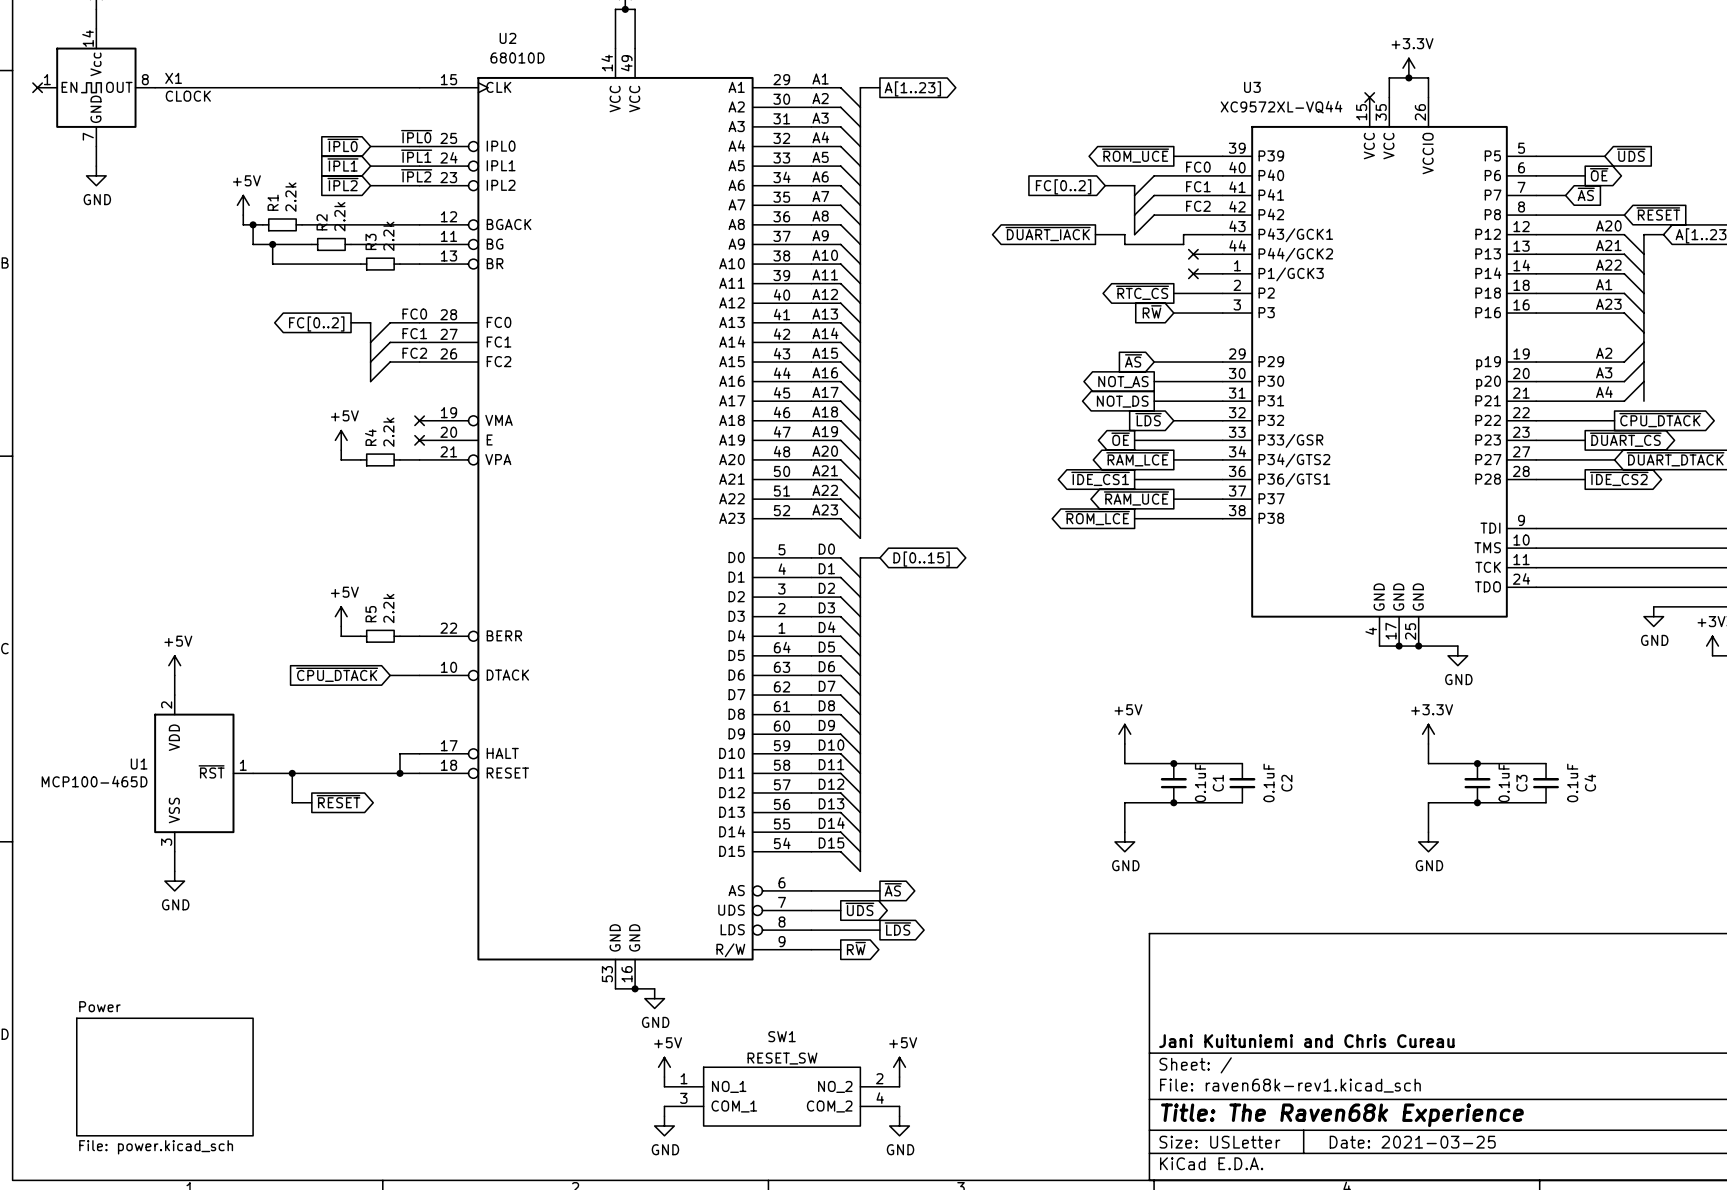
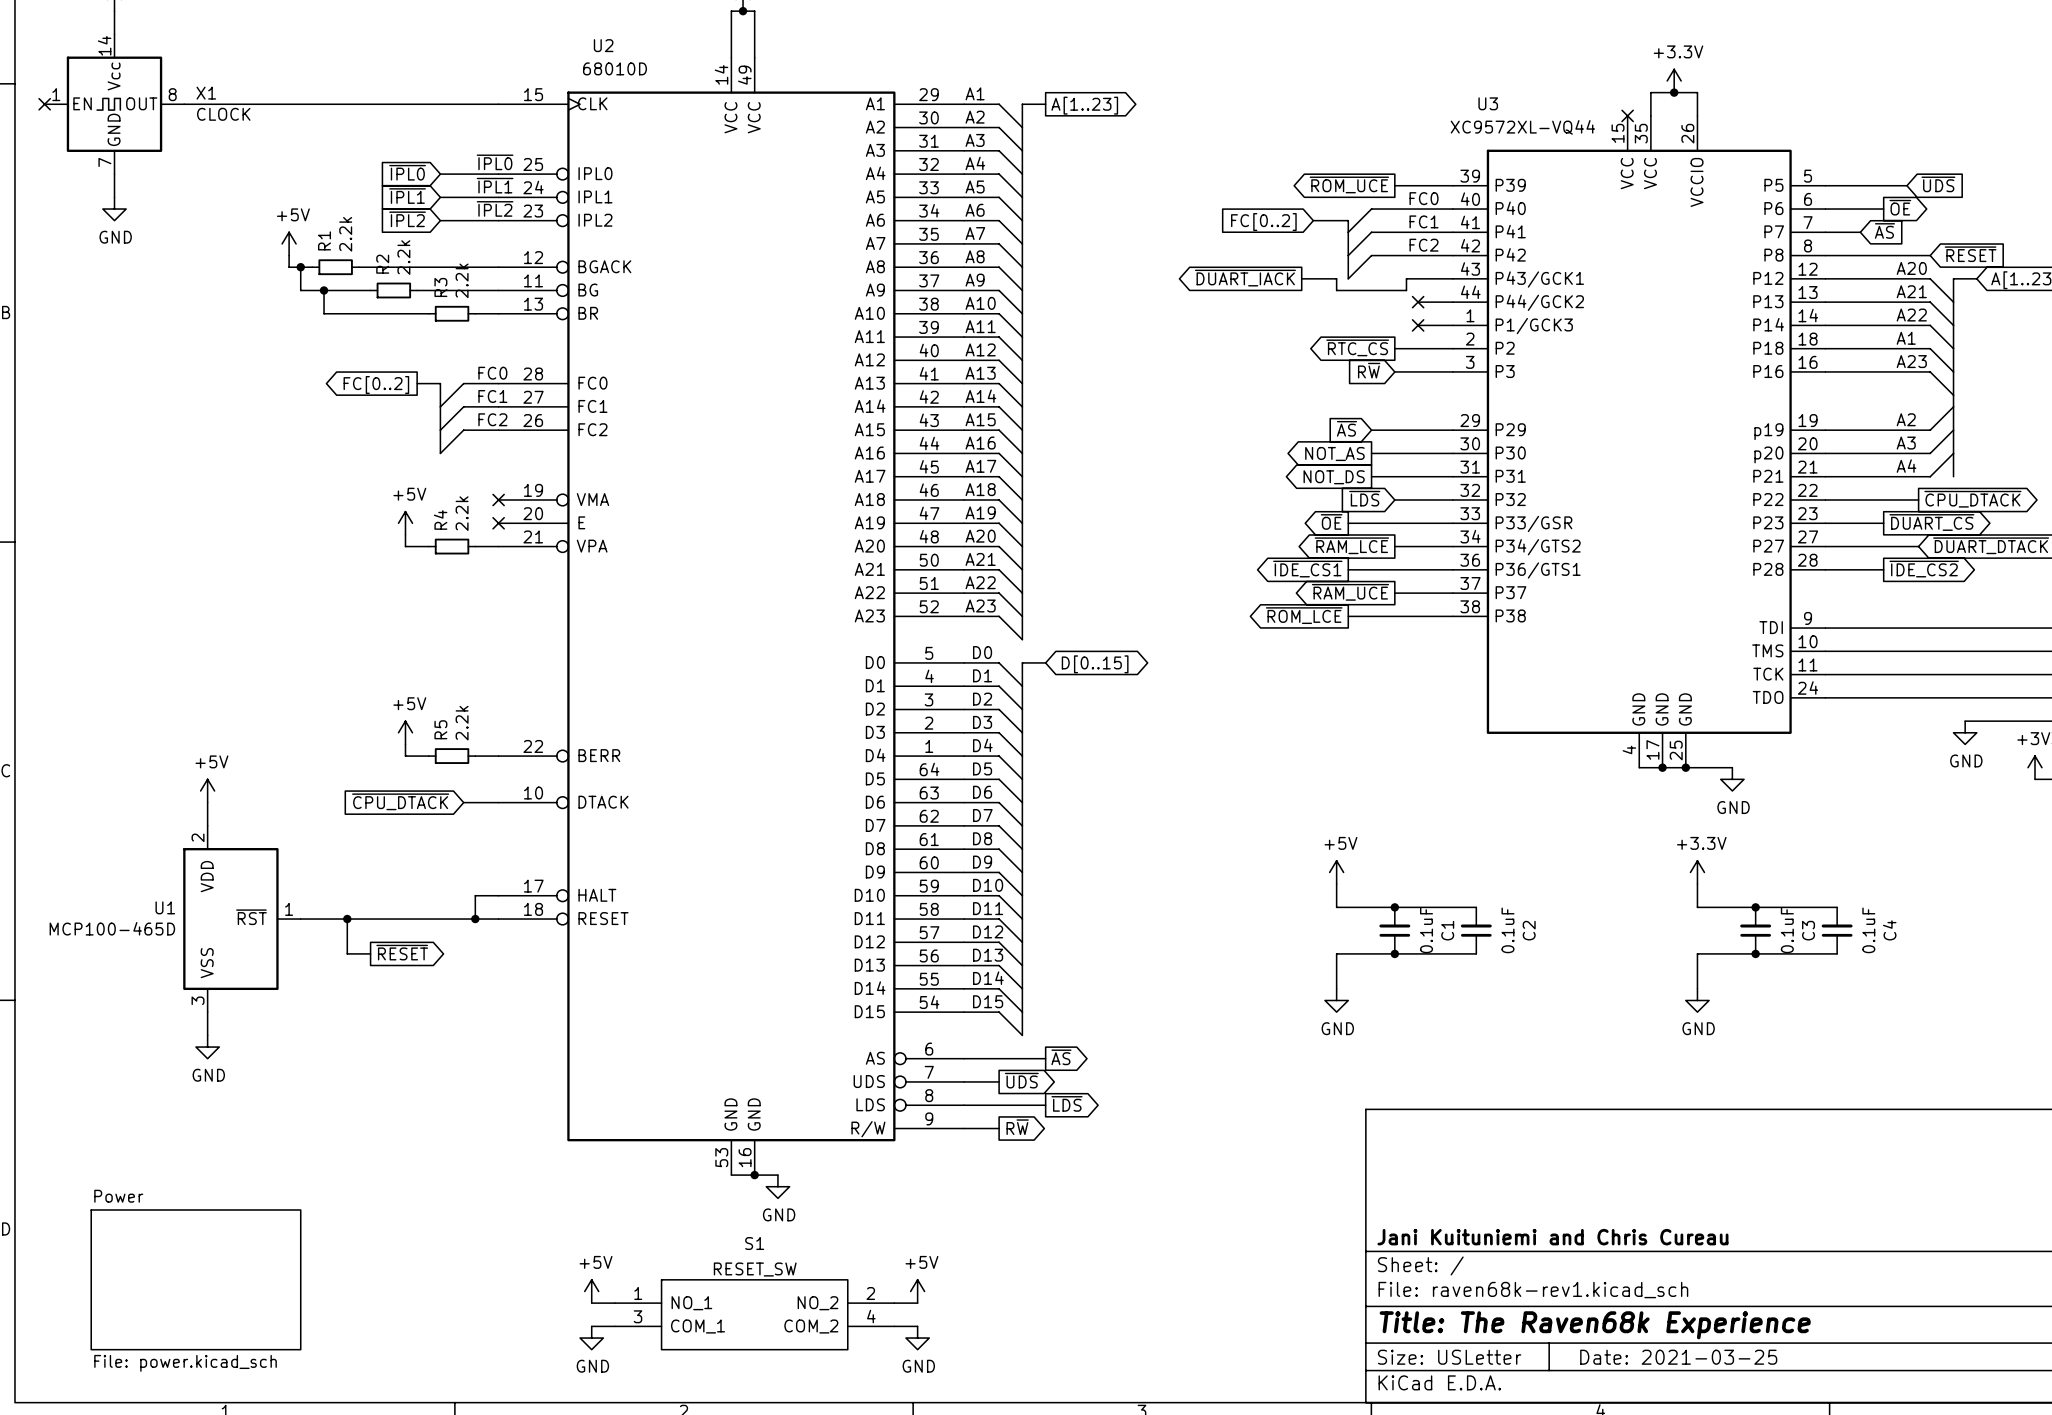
power symbol: +5V (664, 1067) -> none
power symbol: +5V (899, 1067) -> none
wire: (664, 1077) (664, 1086) -> none
wire: (899, 1077) (899, 1086) -> none
power symbol: none -> +5V (591, 1291)
power symbol: none -> +5V (917, 1291)
wire: none -> (591, 1303) (614, 1303)
wire: none -> (894, 1303) (917, 1303)
SW1: RESET_SW (782, 1096) -> none
S1: none -> RESET_SW (754, 1314)
wire: (664, 1106) (664, 1116) -> none
wire: (899, 1106) (899, 1116) -> none
wire: none -> (591, 1326) (614, 1326)
wire: none -> (894, 1326) (917, 1326)
power symbol: none -> GND (591, 1338)
power symbol: GND (664, 1126) -> none
power symbol: none -> GND (917, 1338)
power symbol: GND (899, 1126) -> none

